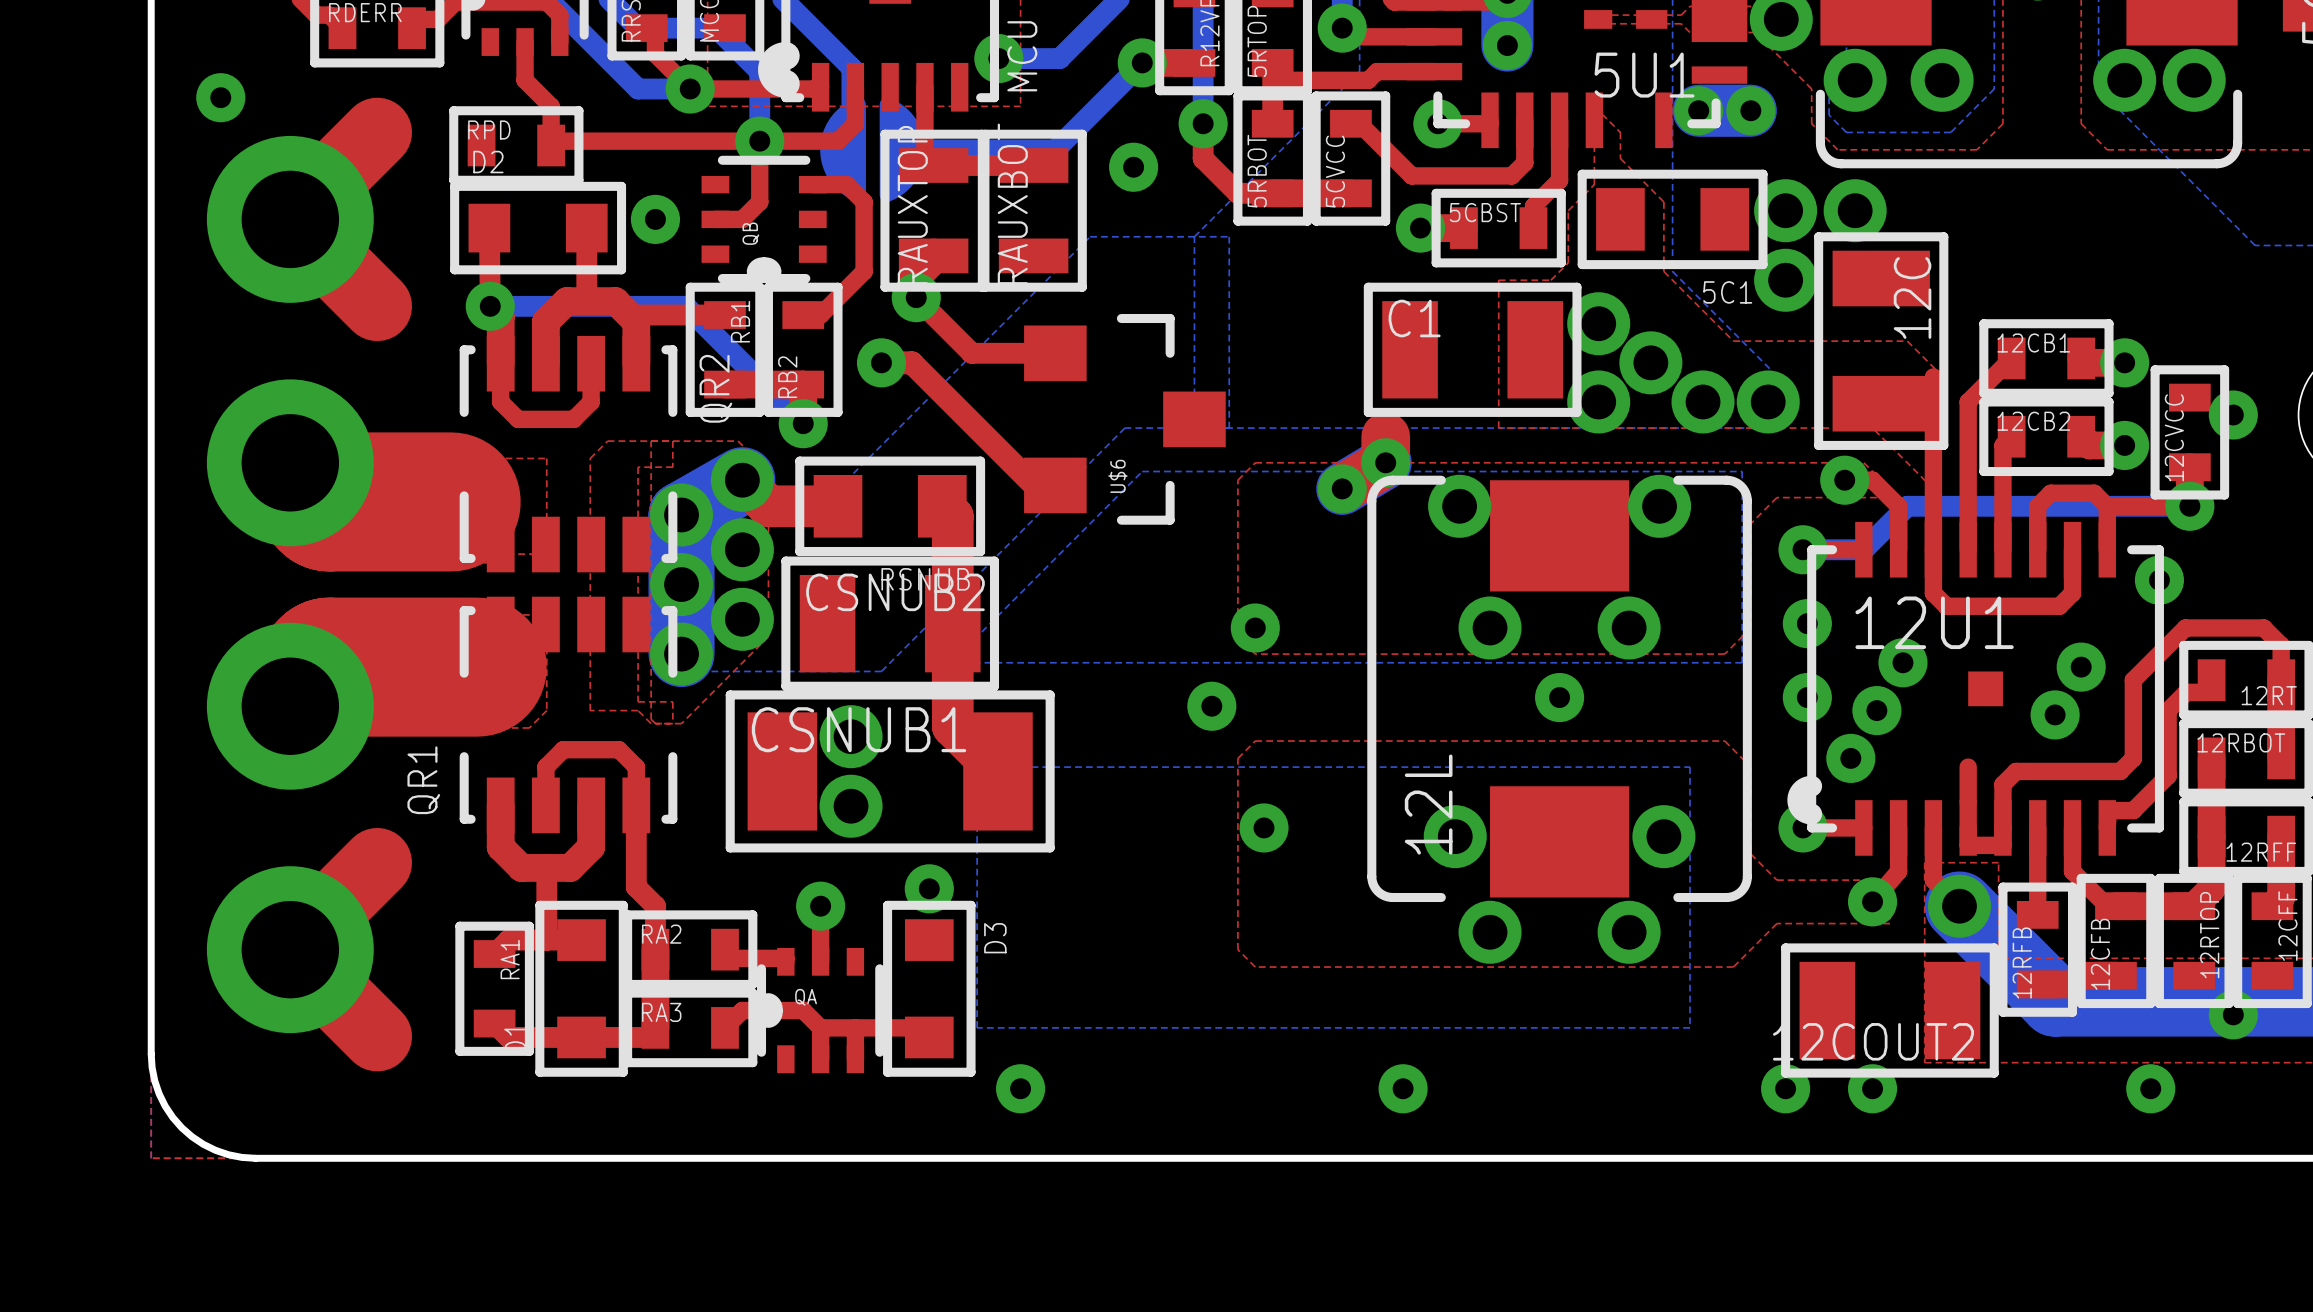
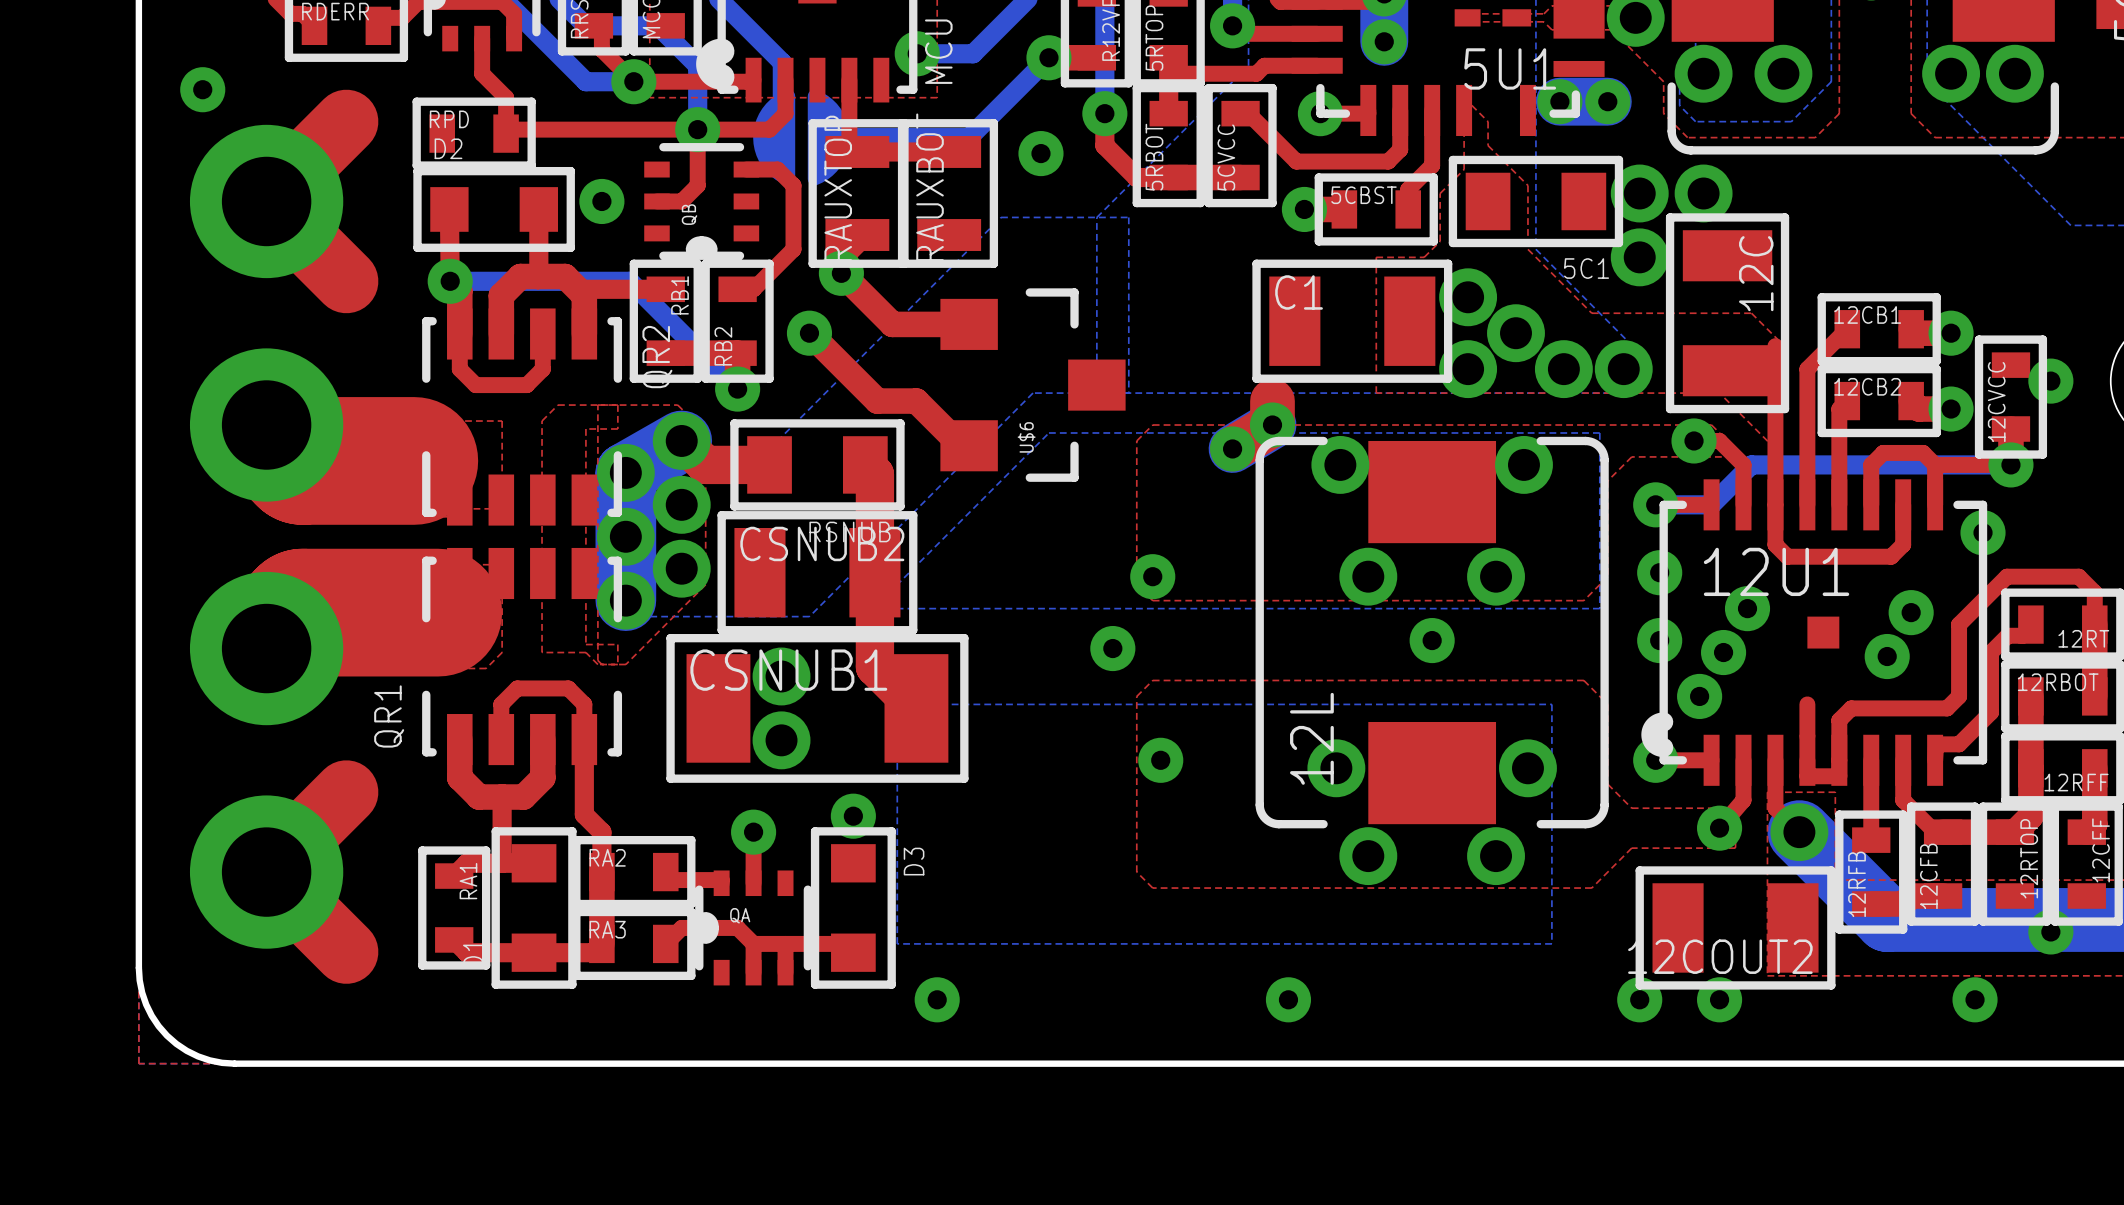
top track width: thin (916, 297) (971, 353) (1046, 353) -> thick (841, 273) (892, 324) (961, 324)
top track: (881, 362) (911, 362) (1034, 485) (1055, 485) -> (809, 333) (877, 401) (916, 401) (961, 445)

